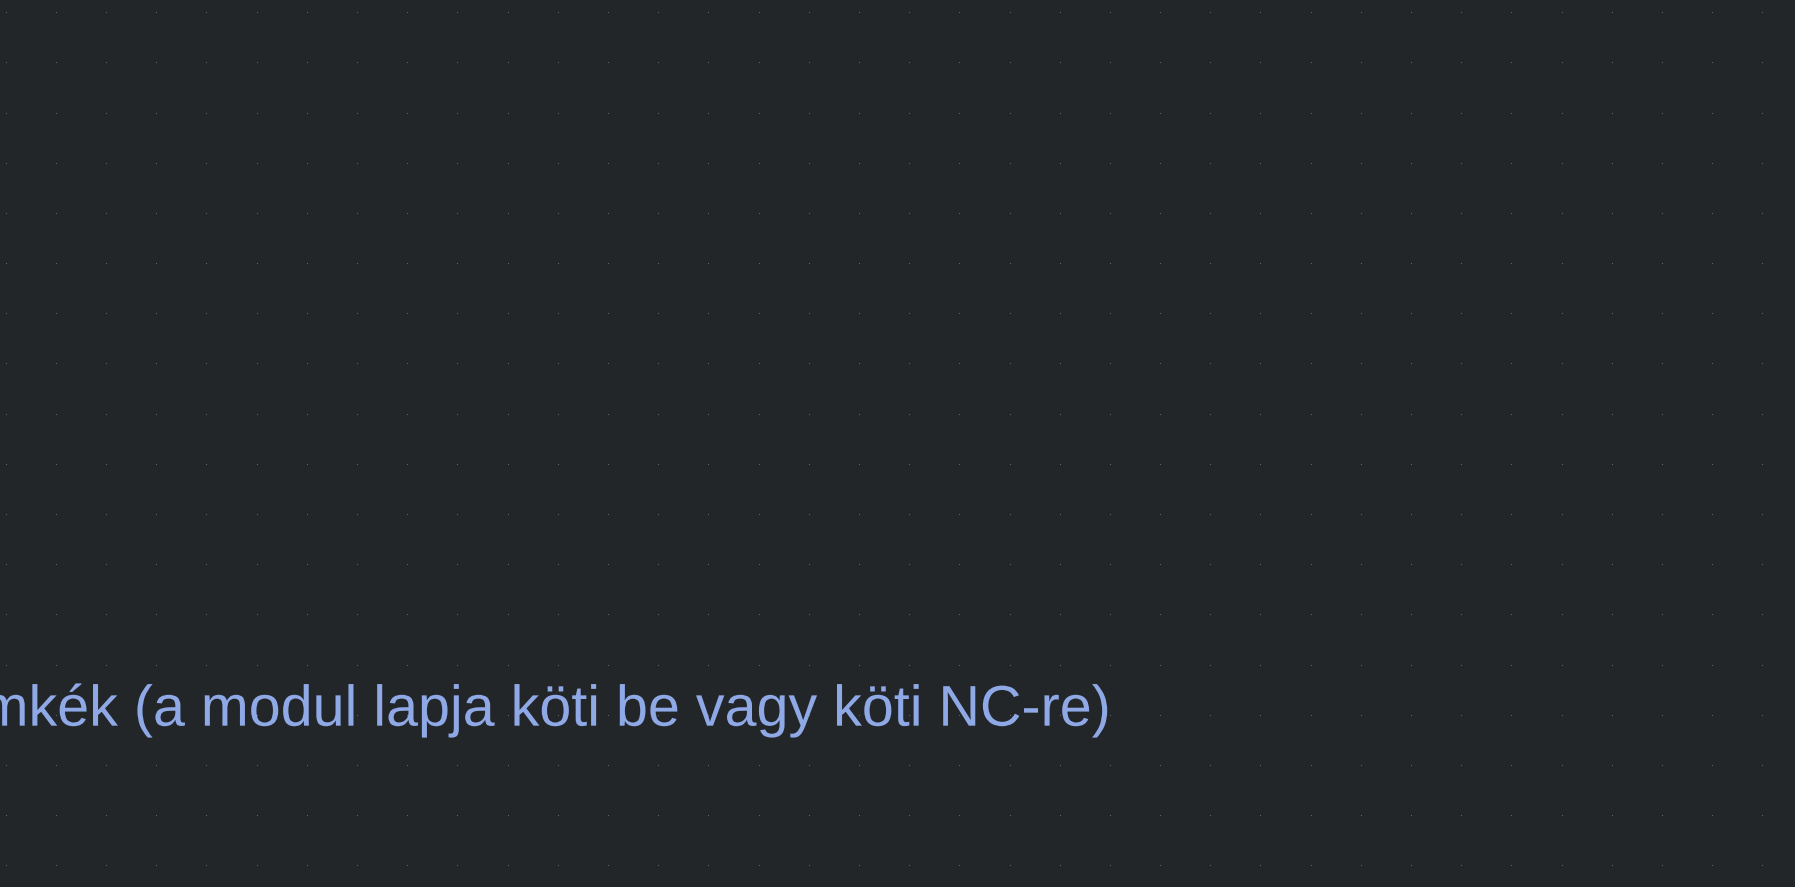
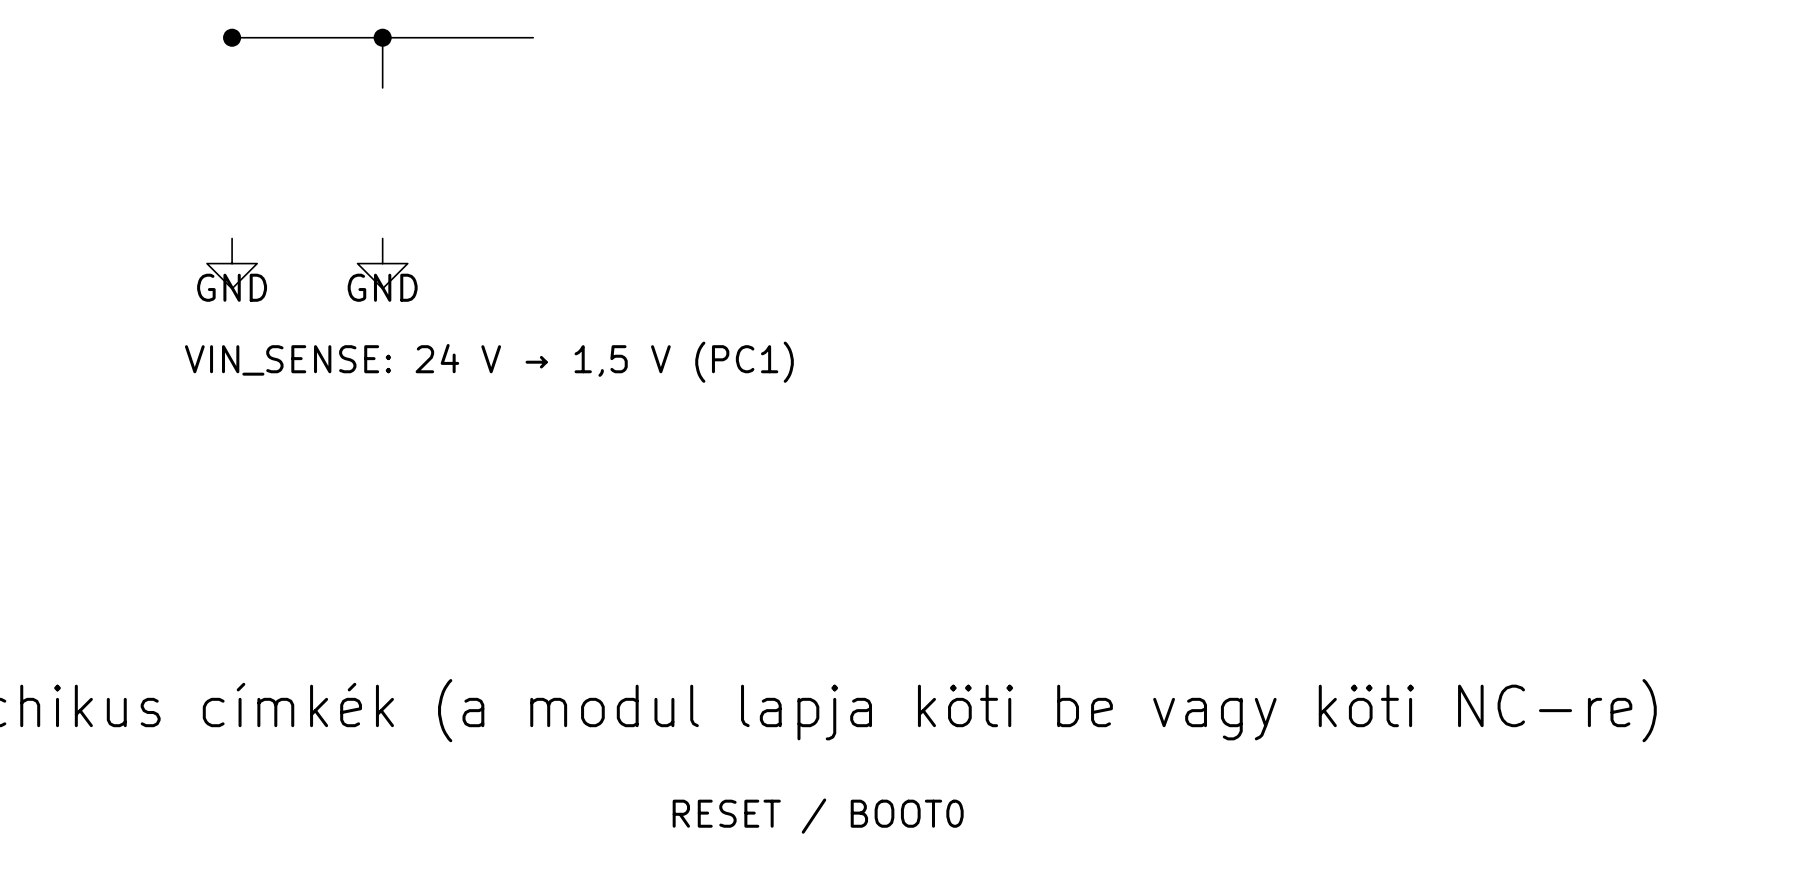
wire: none -> (232, 37) (533, 37)
junction: none -> (232, 37)
wire: none -> (382, 37) (382, 87)
junction: none -> (382, 37)
power symbol: none -> GND (232, 263)
power symbol: none -> GND (382, 263)
text: none -> VIN_SENSE: 24 V → 1,5 V (PC1) (489, 362)
text: none -> RESET / BOOT0 (818, 816)

